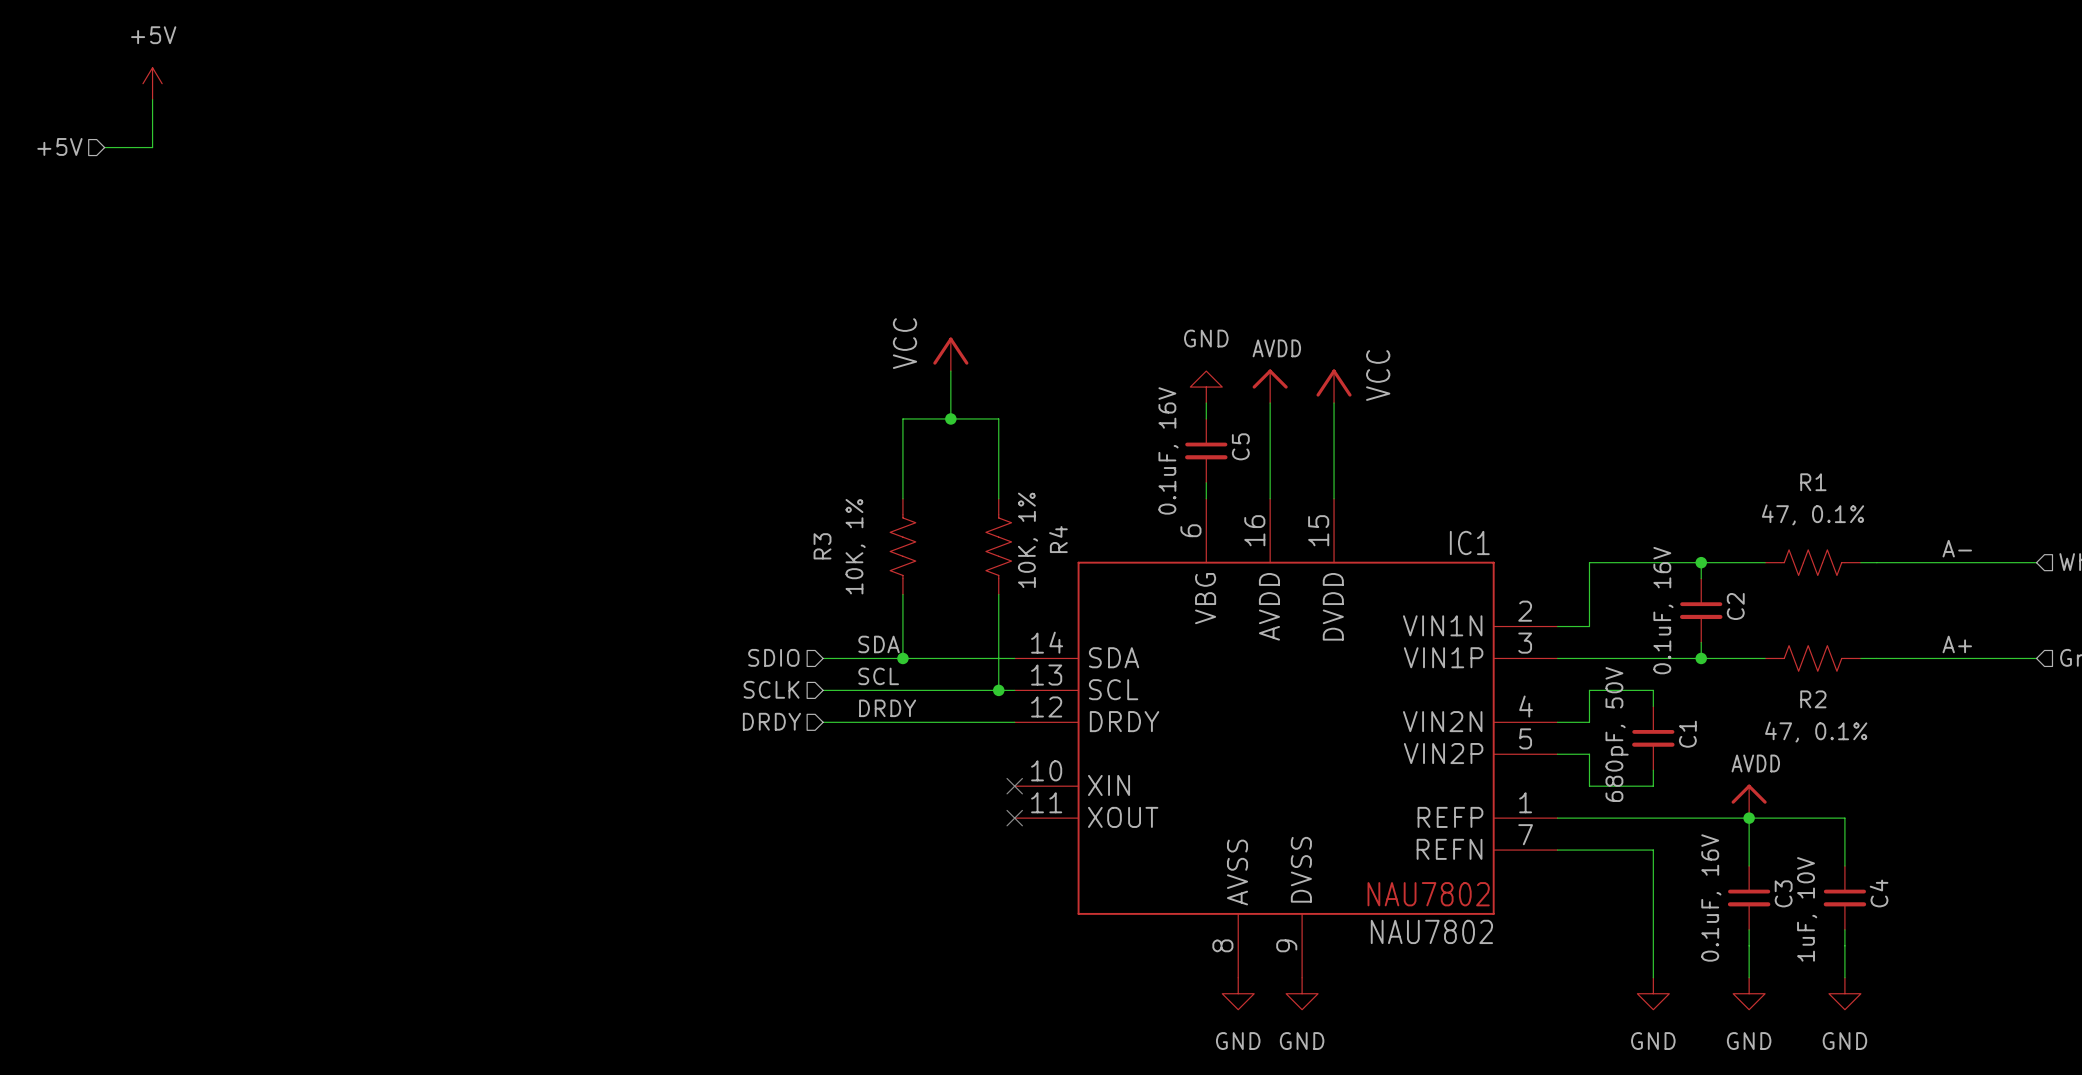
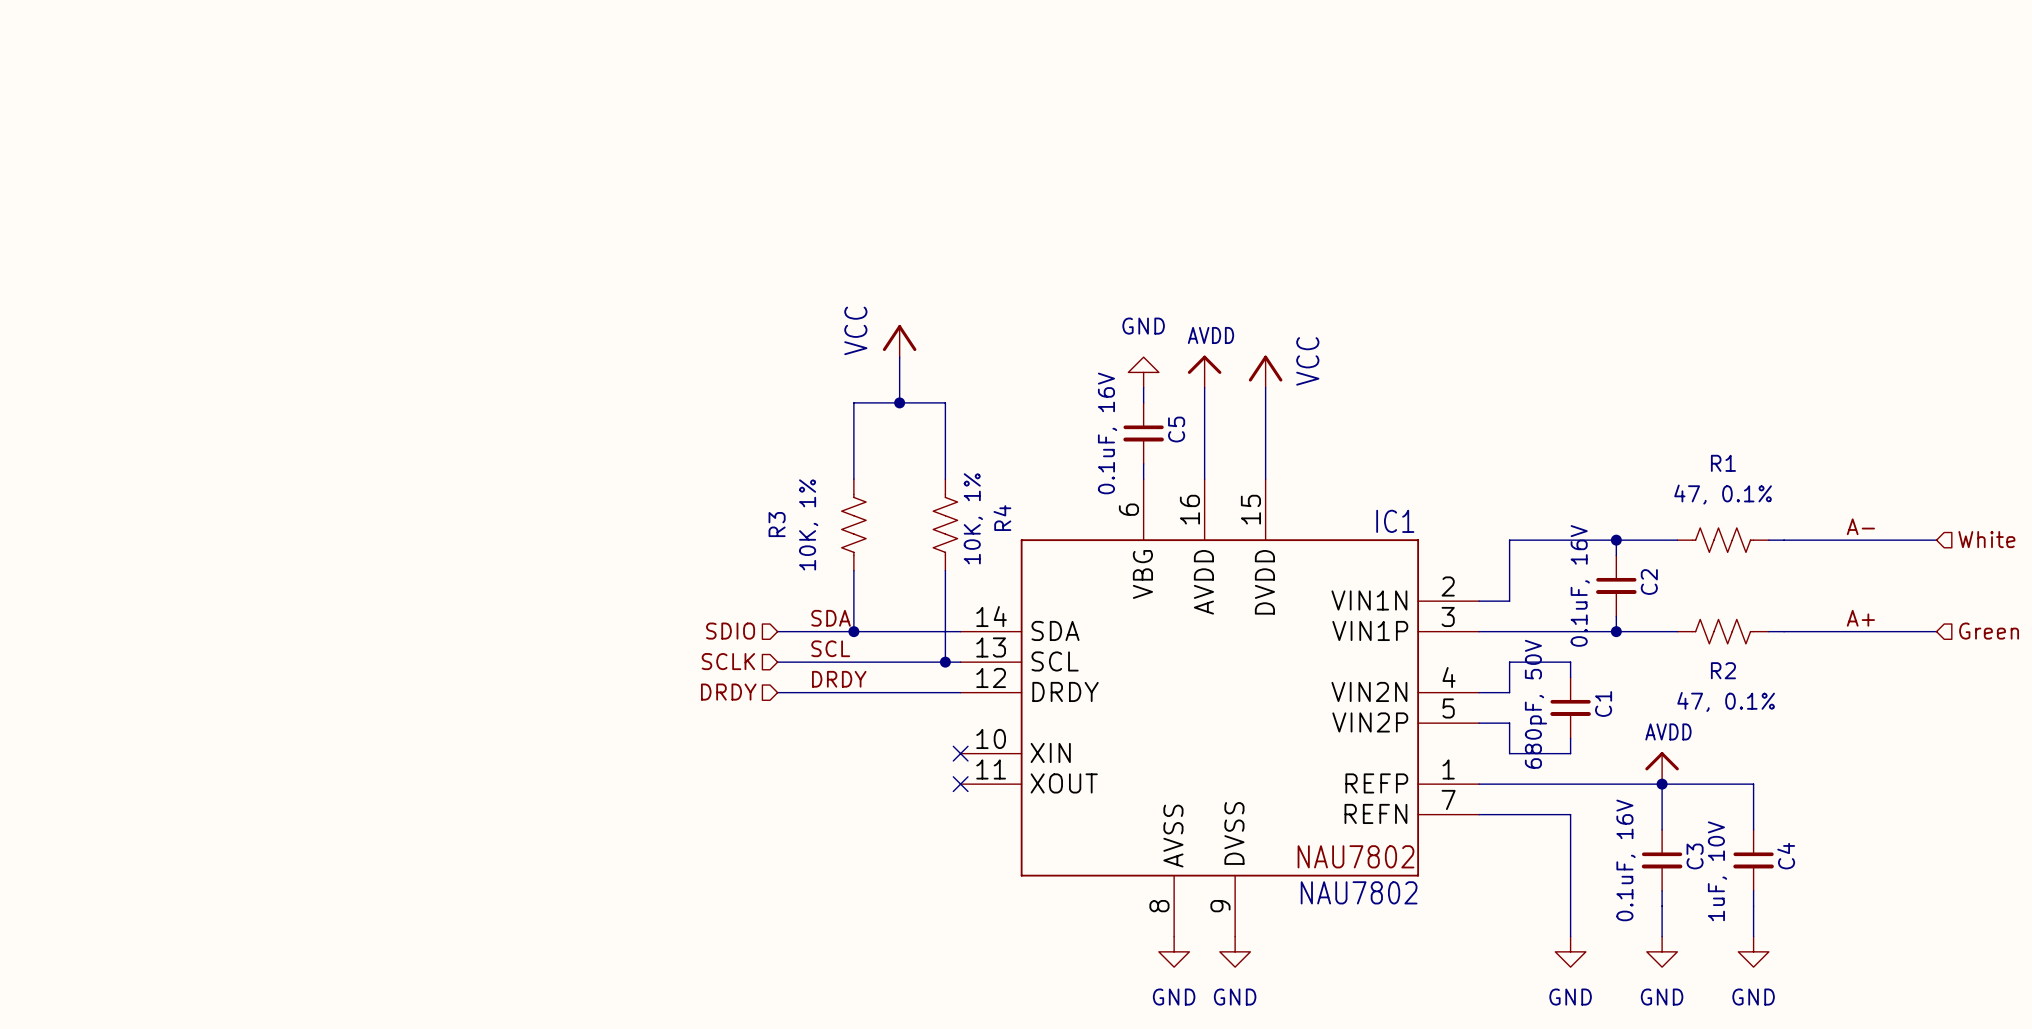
power symbol: +5V (152, 83) -> none
wire: (152, 99) (152, 147) (104, 147) -> none
hierarchical label: +5V (59, 146) -> none

